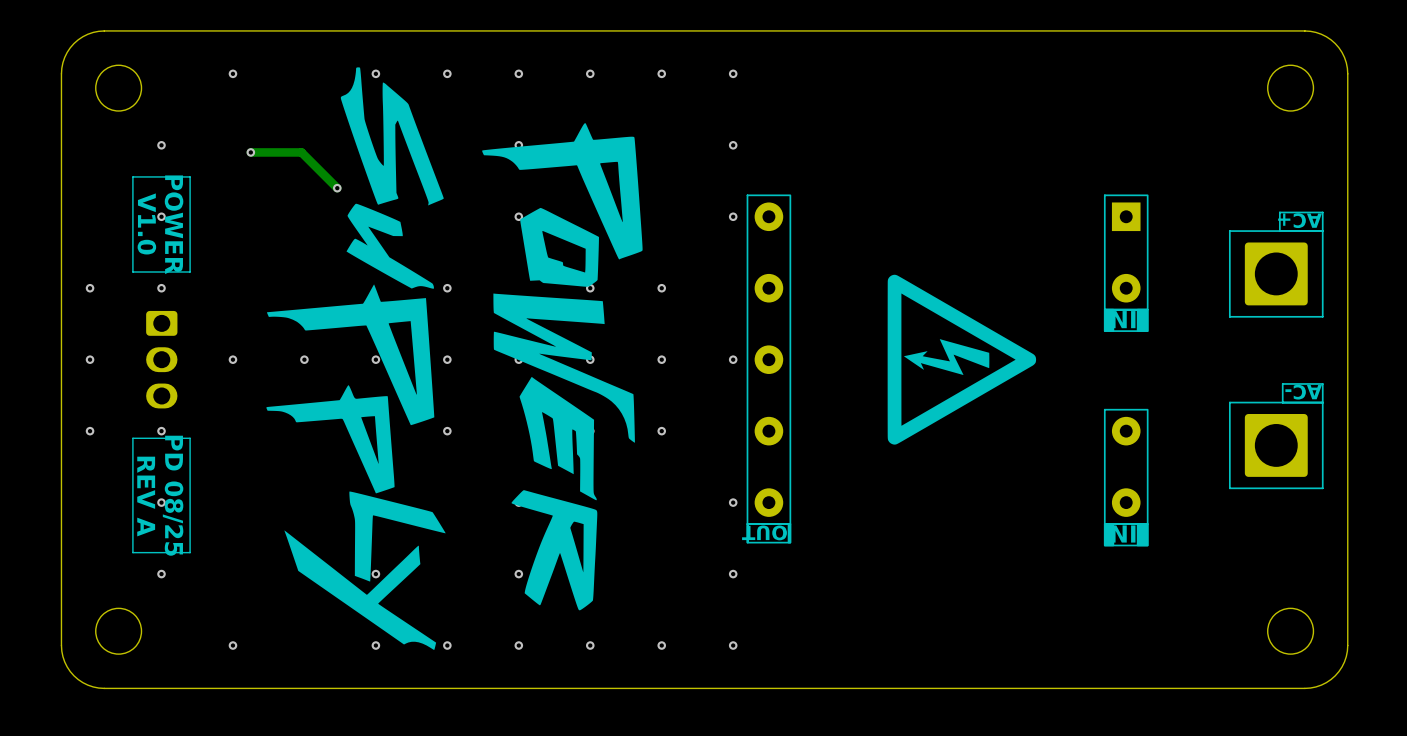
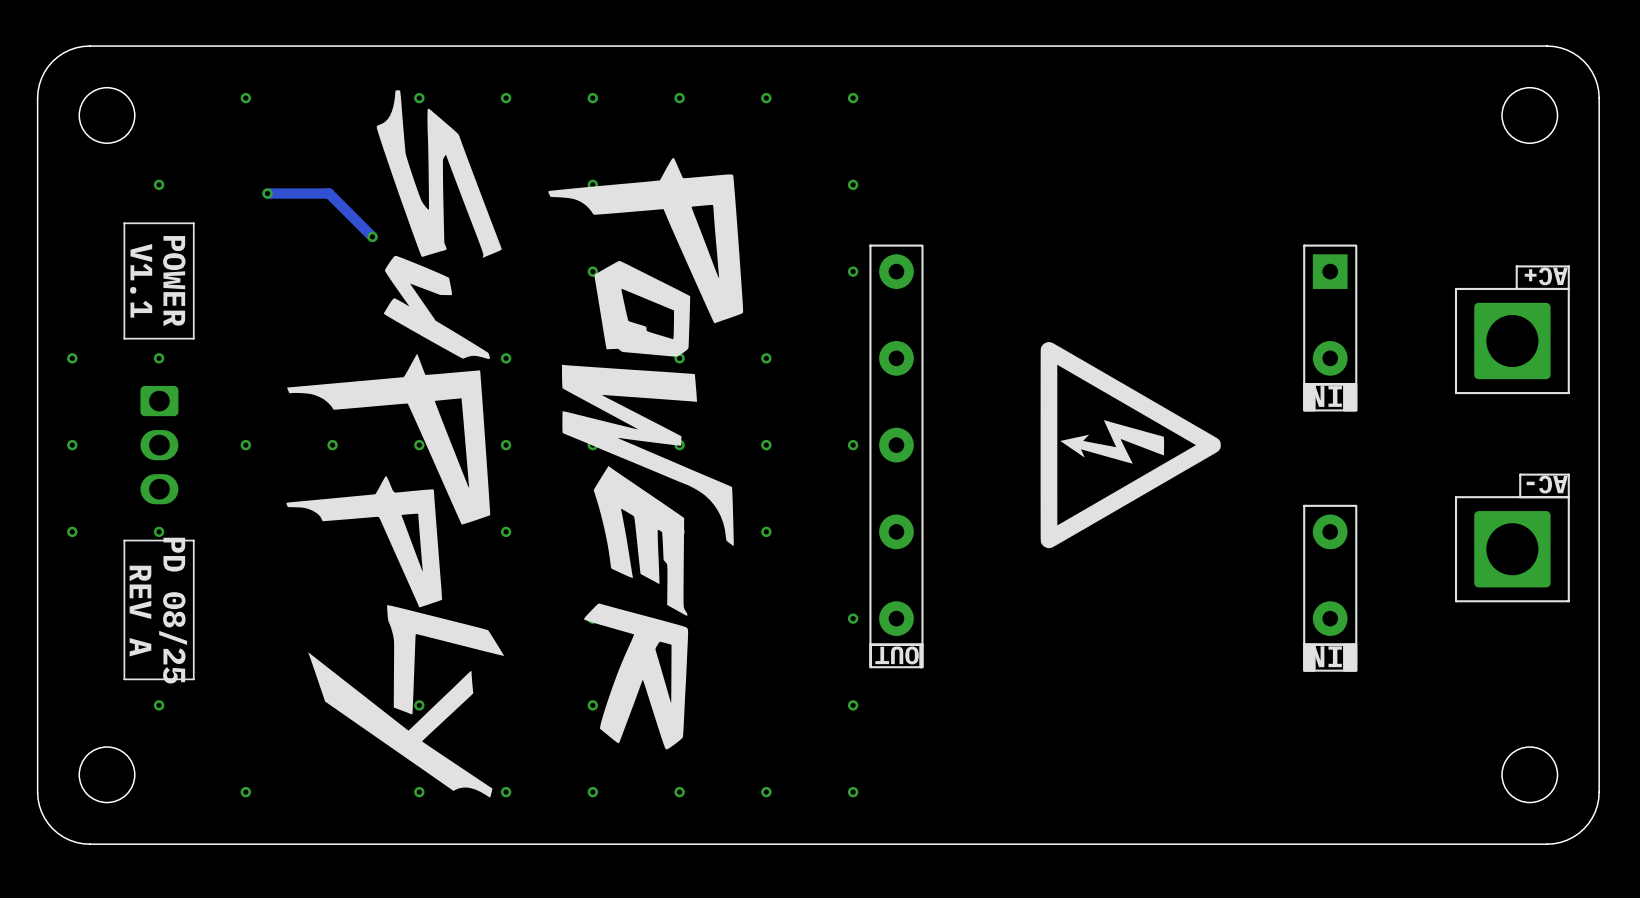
via: (161, 216) -> none
text: V1.0 (146, 223) -> V1.1 (141, 280)
via: (161, 502) -> none

